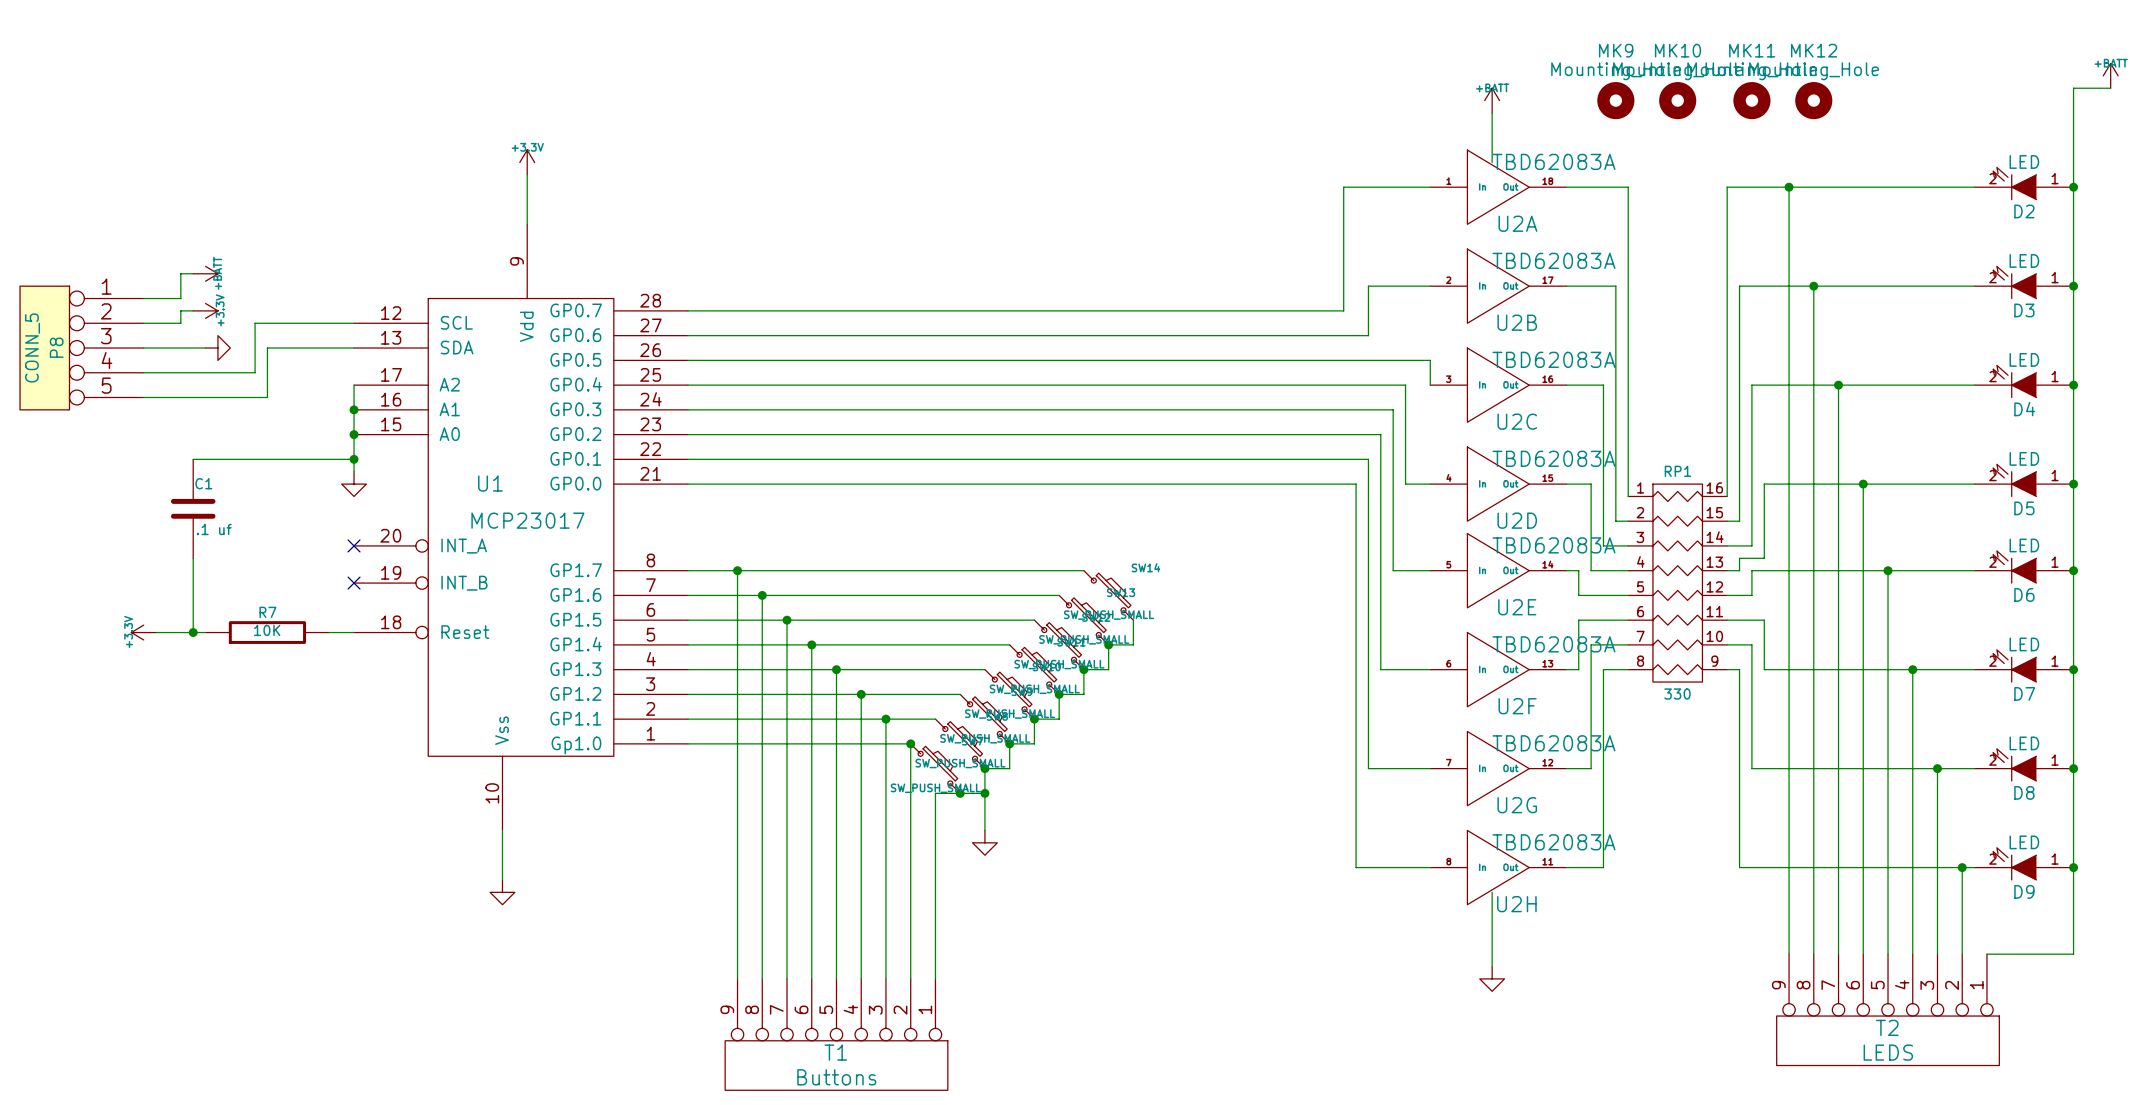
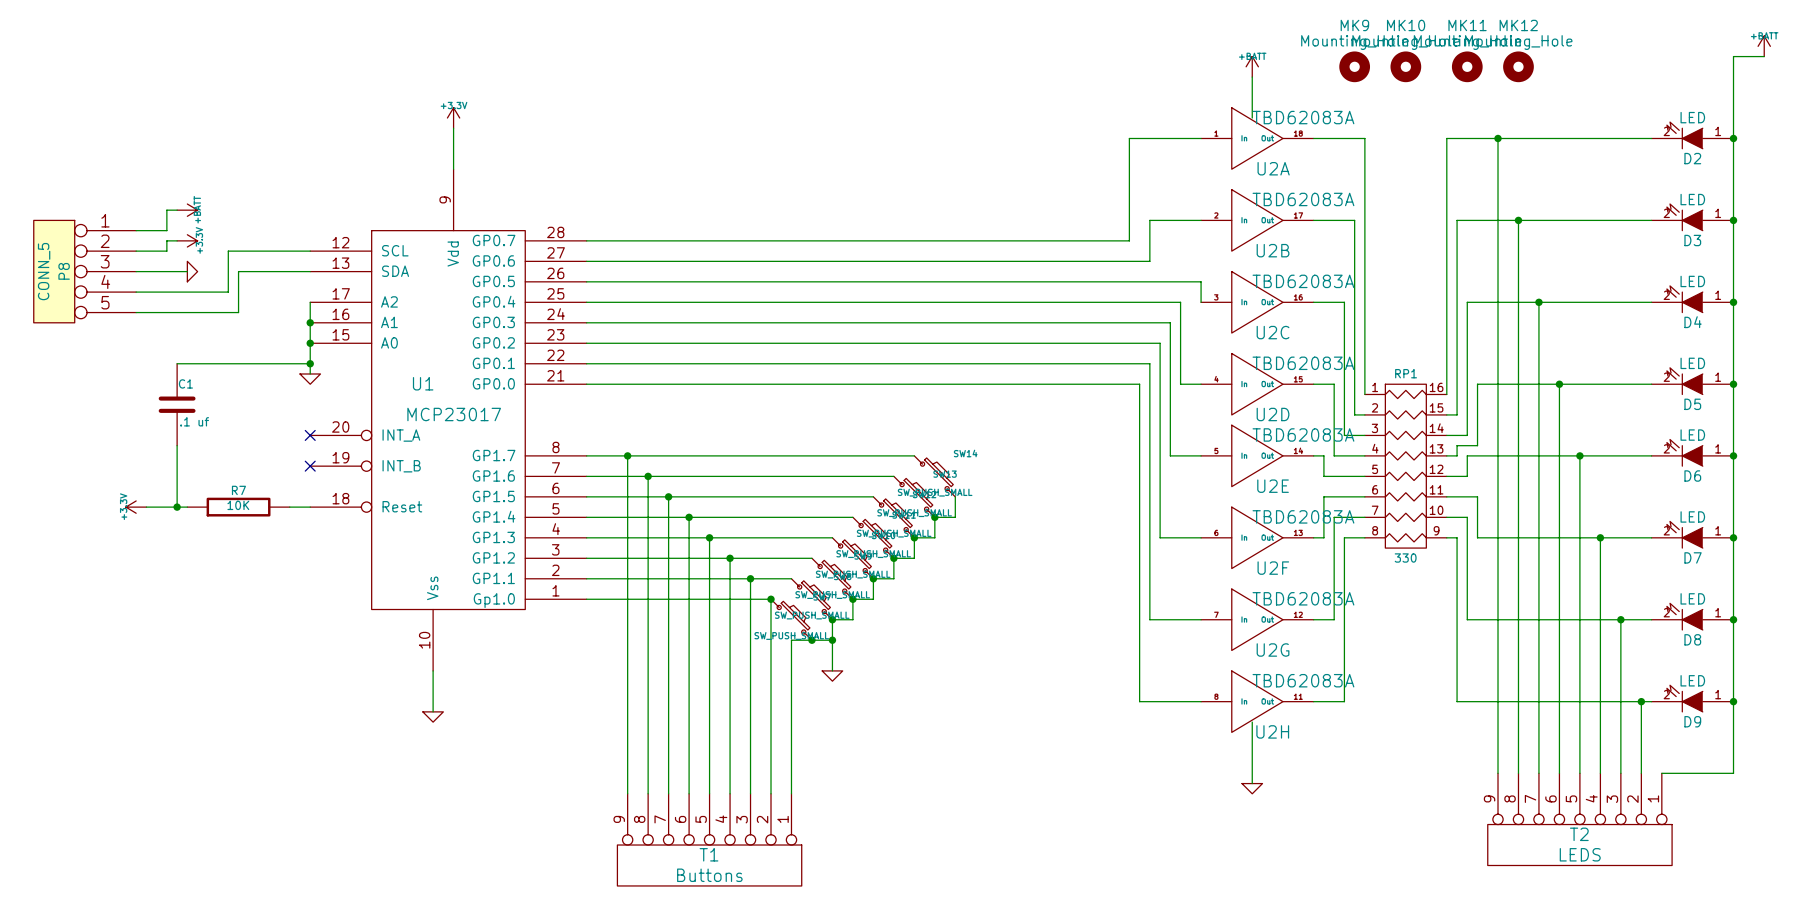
power symbol shape: [205, 335, 231, 361] -> [187, 261, 198, 282]
power symbol shape: [341, 471, 367, 497] -> [299, 373, 321, 385]
power symbol shape: [972, 830, 998, 856] -> [822, 670, 843, 682]
power symbol shape: [490, 879, 515, 905] -> [422, 711, 444, 723]
power symbol shape: [1479, 966, 1505, 992] -> [1242, 783, 1263, 794]

